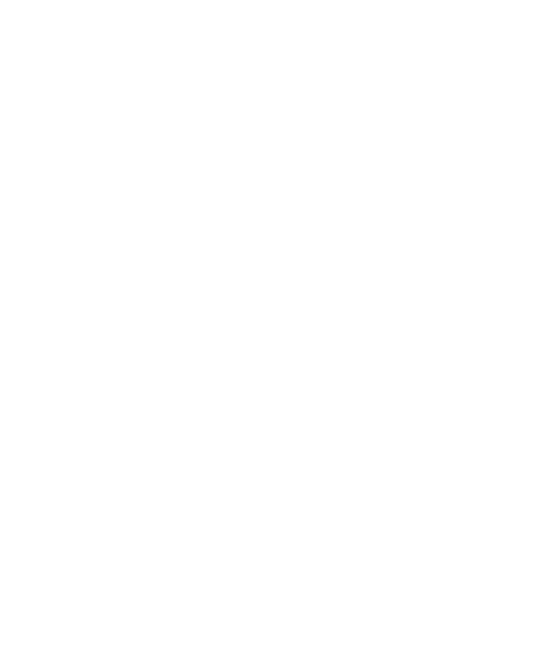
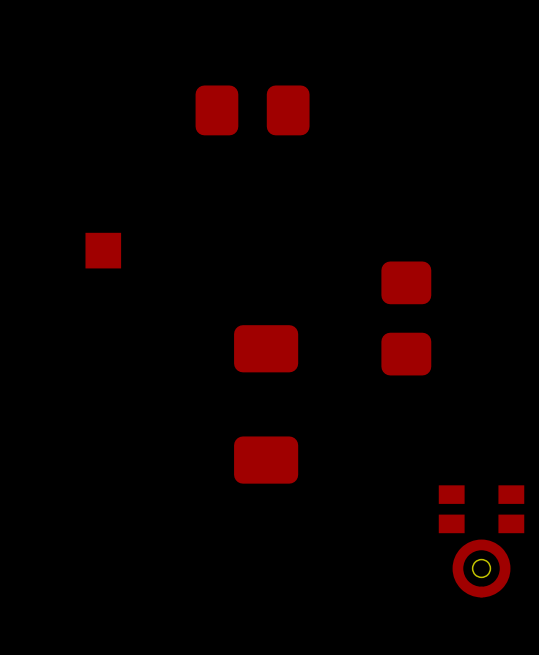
part: none -> (252, 110)
part: none -> (103, 250)
part: none -> (406, 318)
part: none -> (266, 404)
part: none -> (481, 541)

